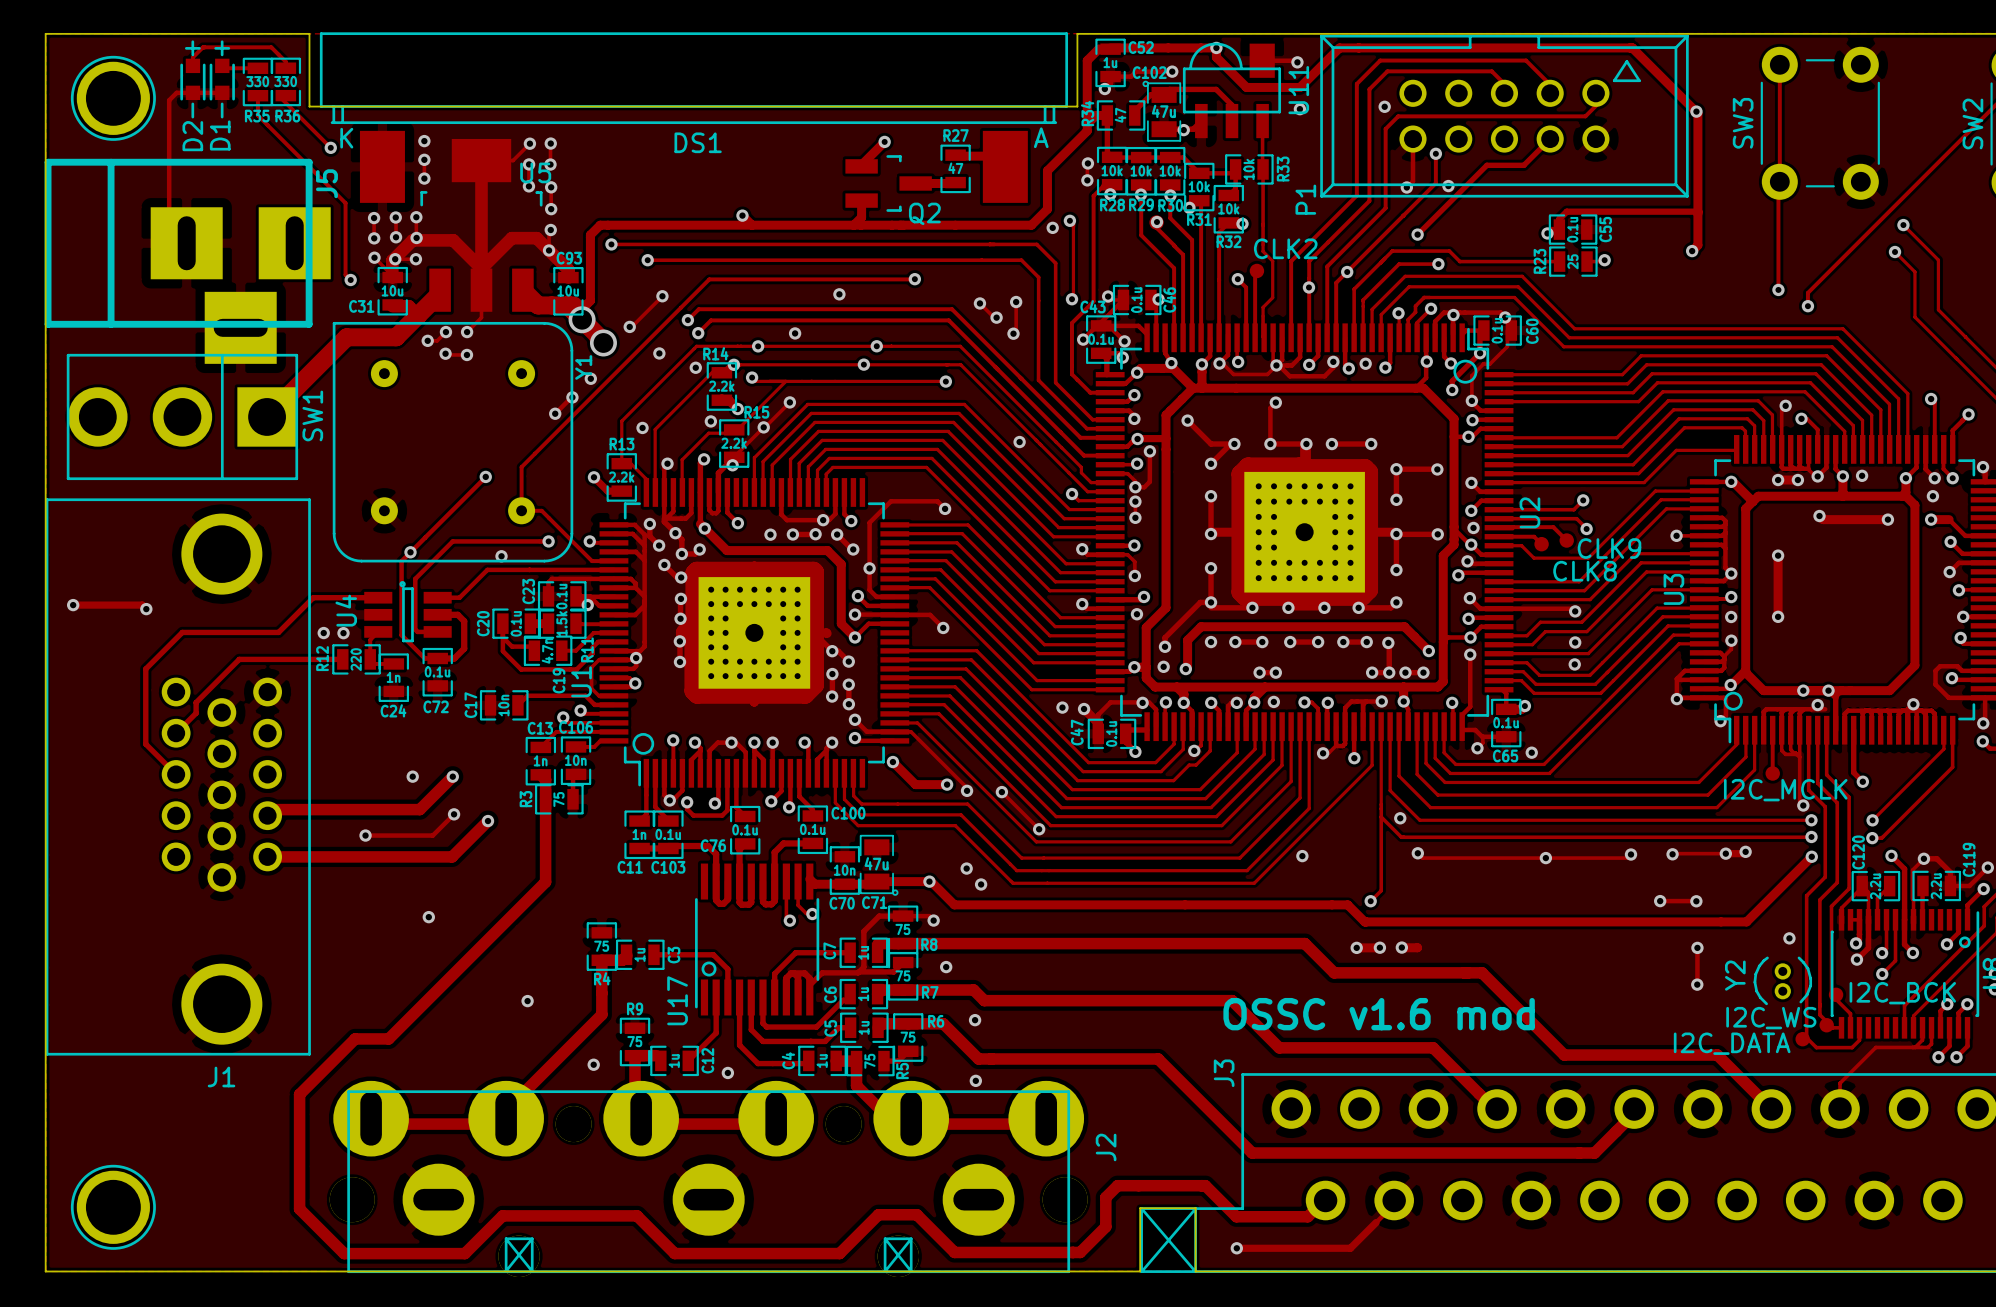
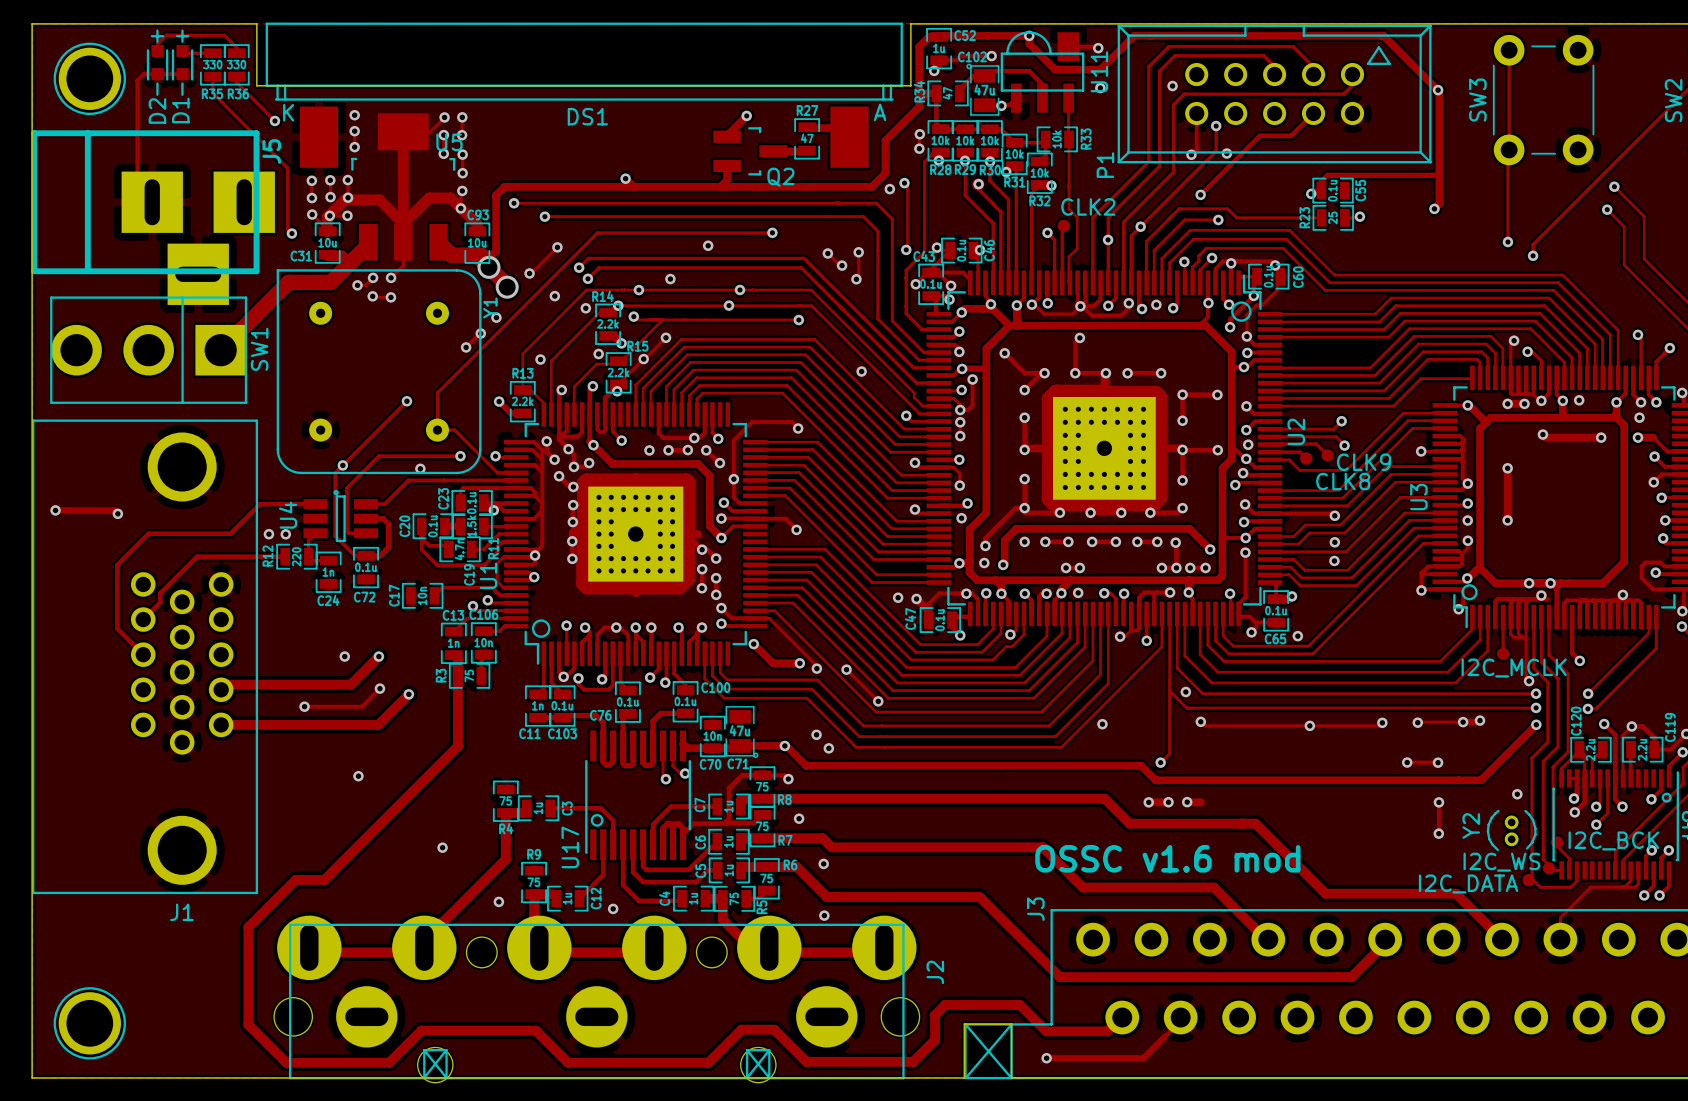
J2 footprint: [329, 1080, 1088, 1278] -> [274, 915, 920, 1083]

